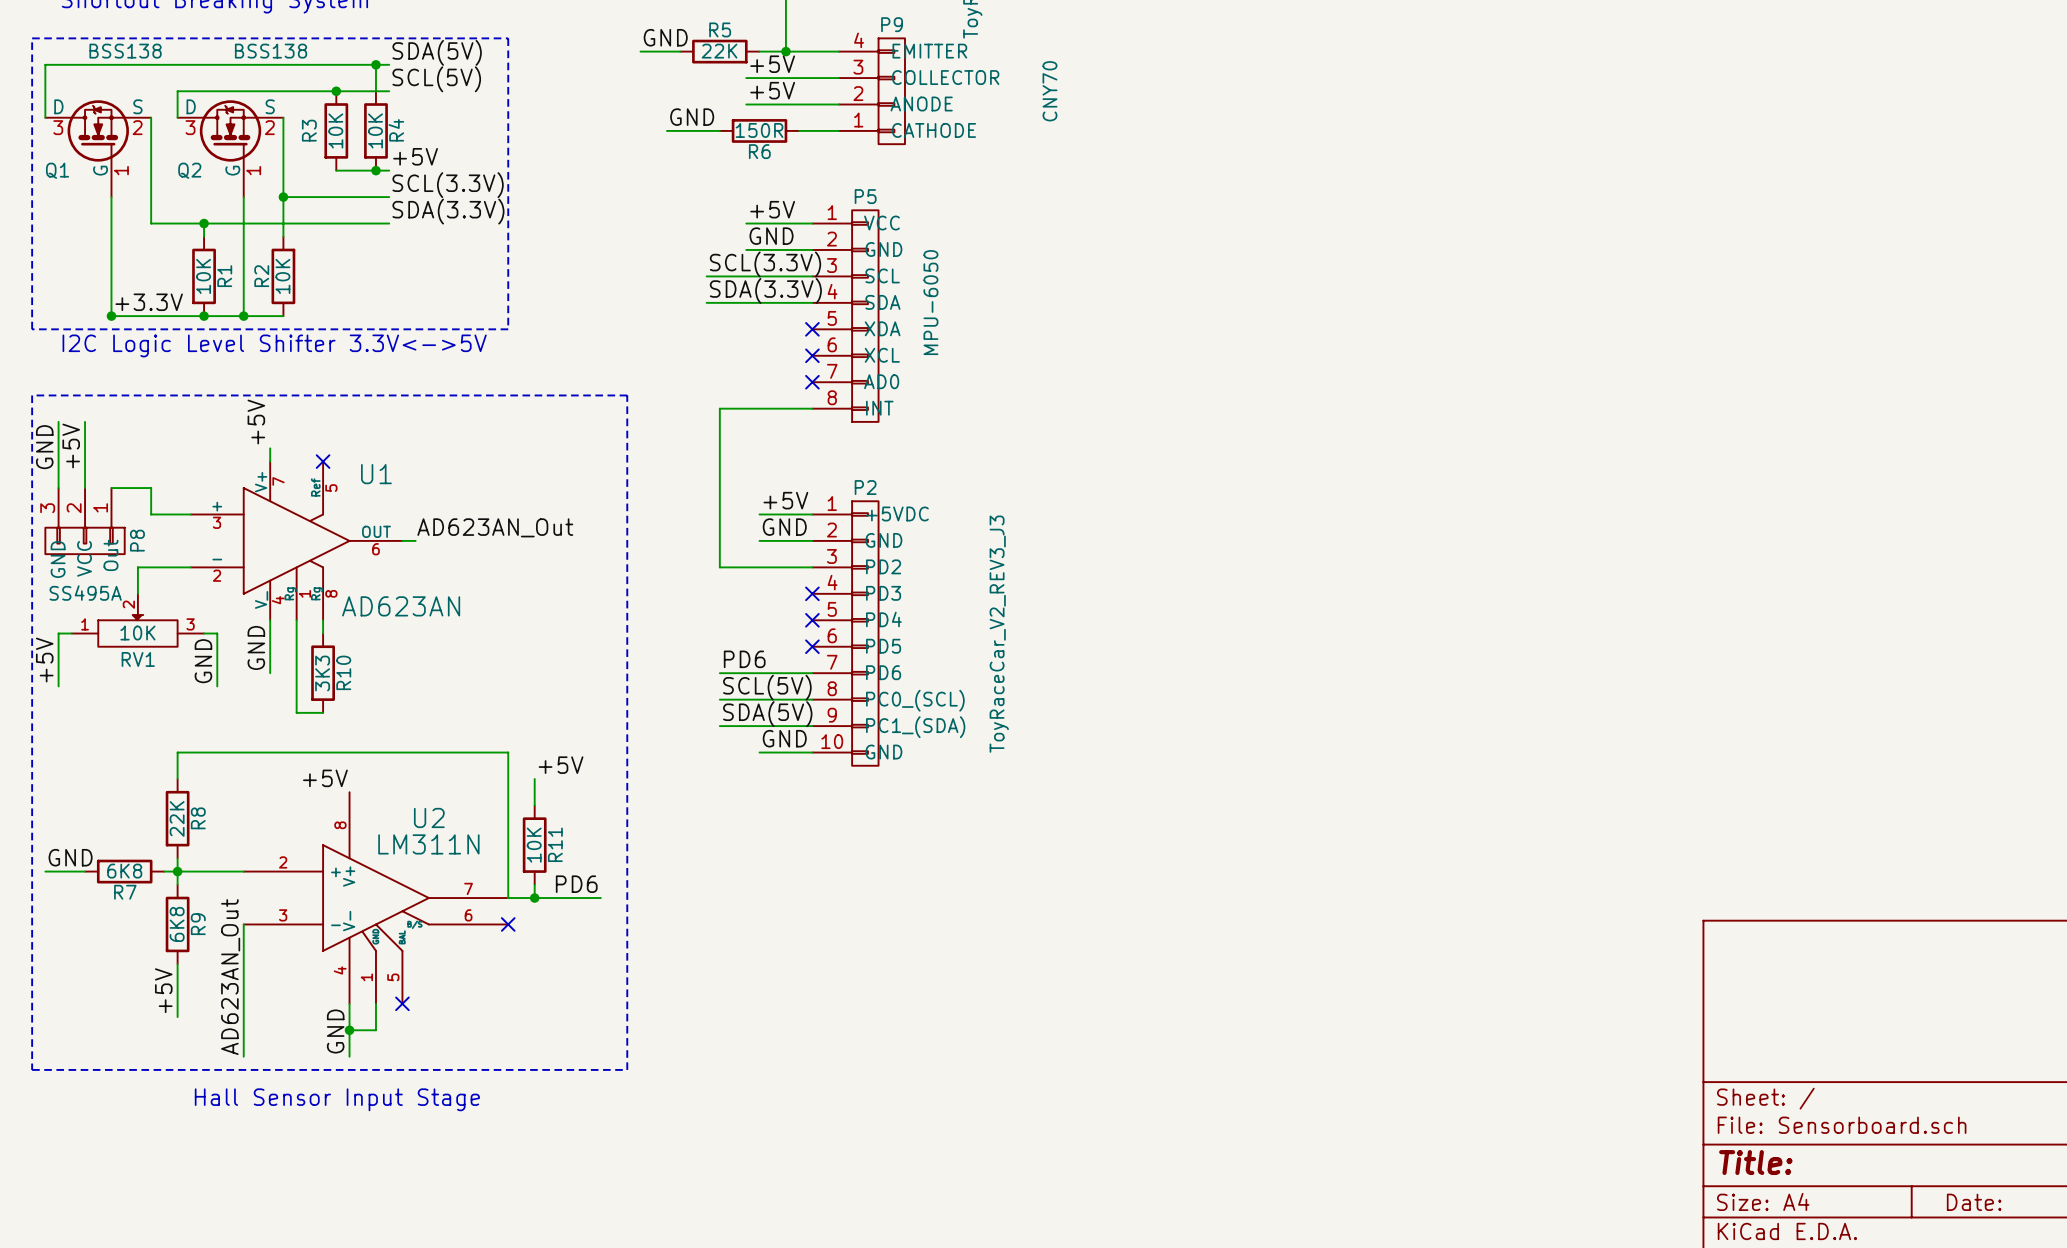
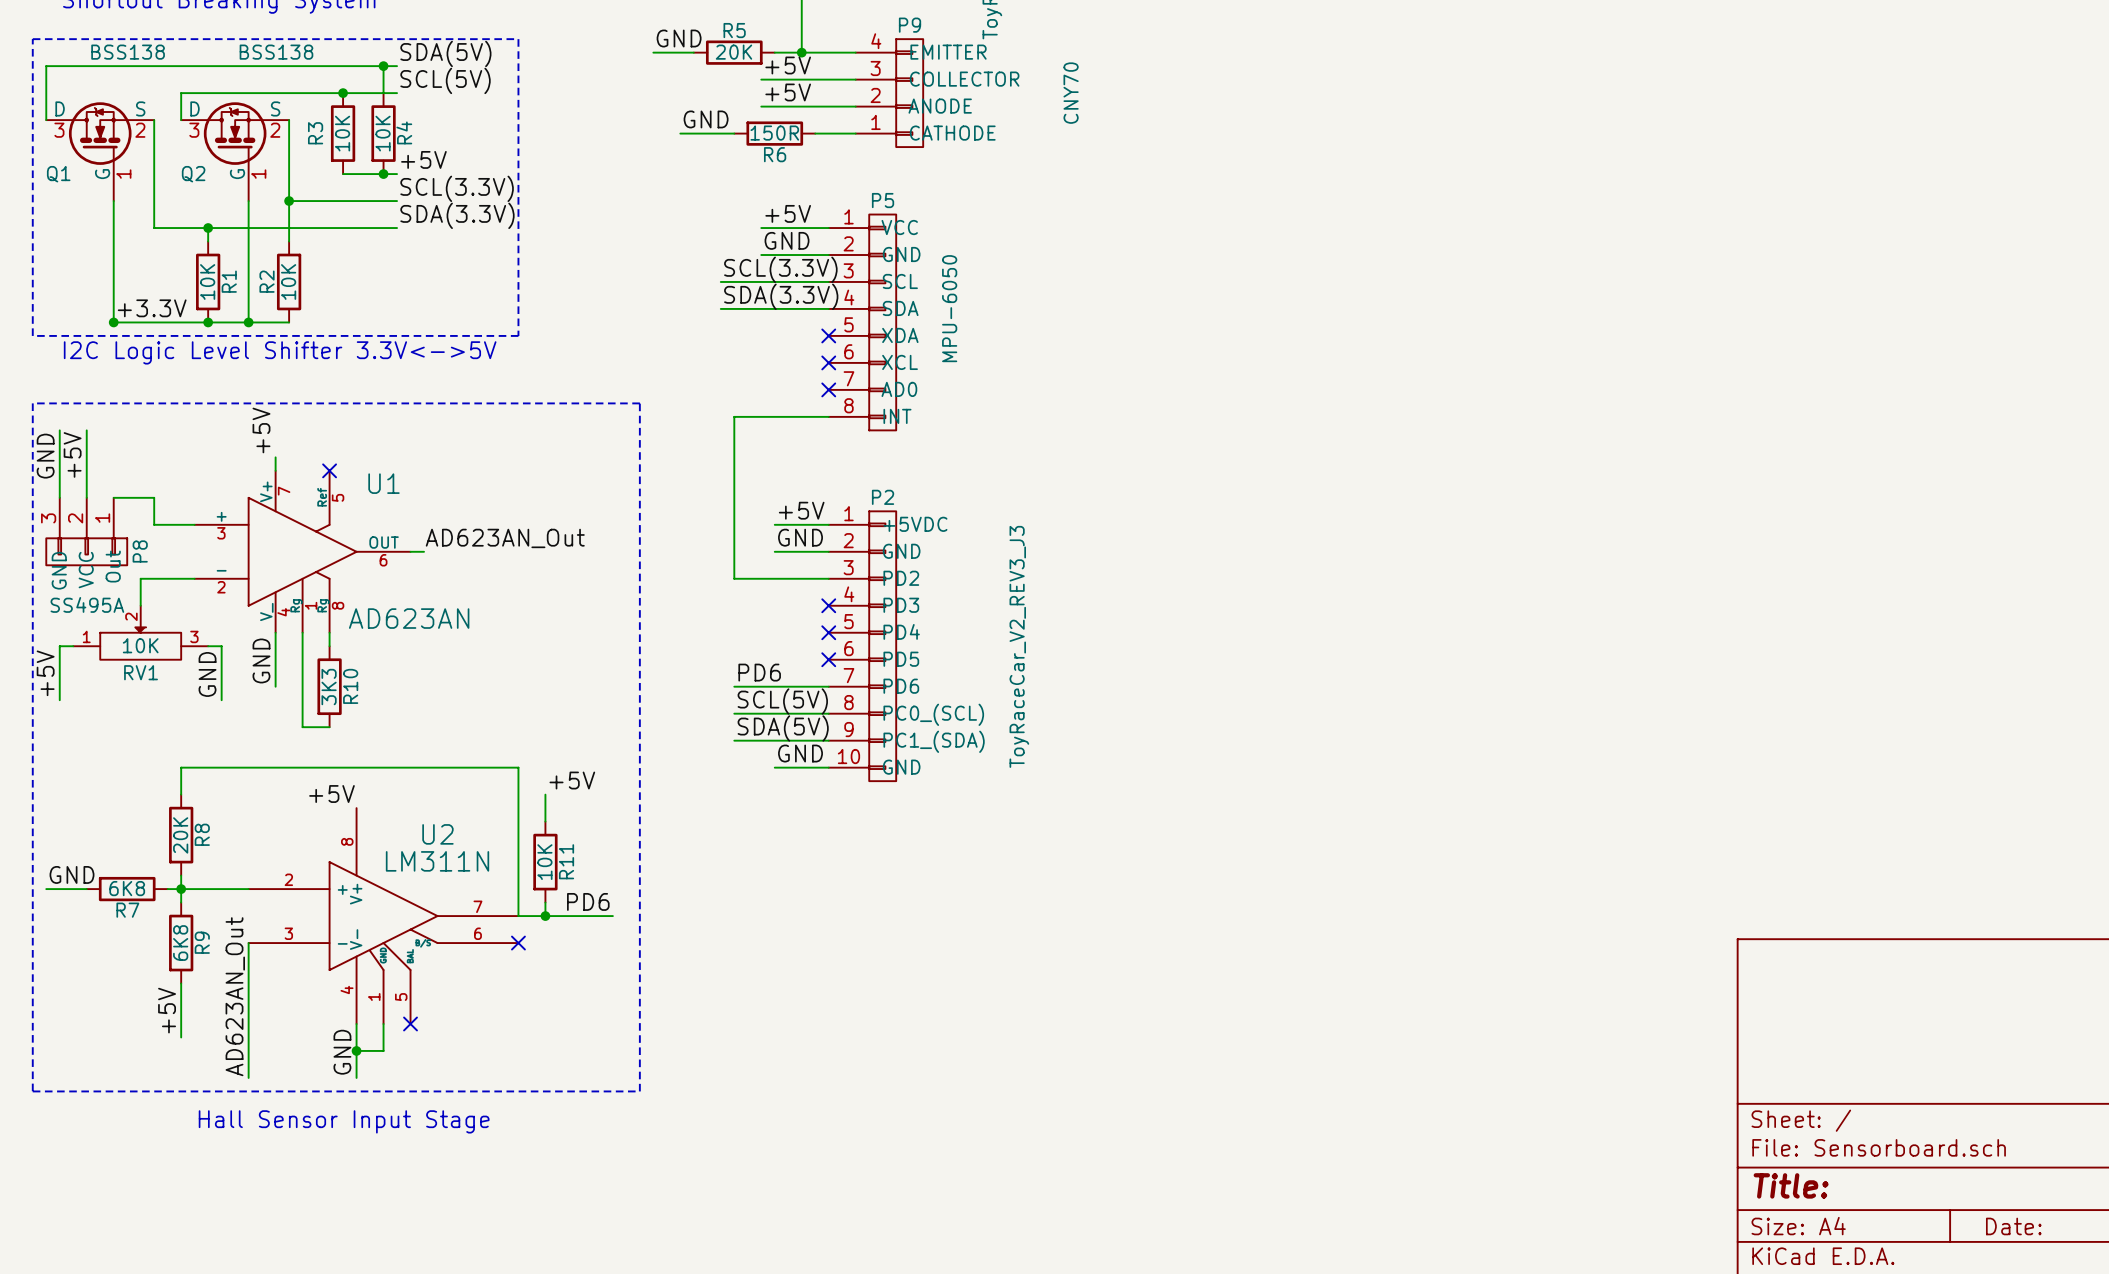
R5 value: 22K (719, 51) -> 20K (733, 52)
R8 value: 22K (177, 818) -> 20K (180, 835)

